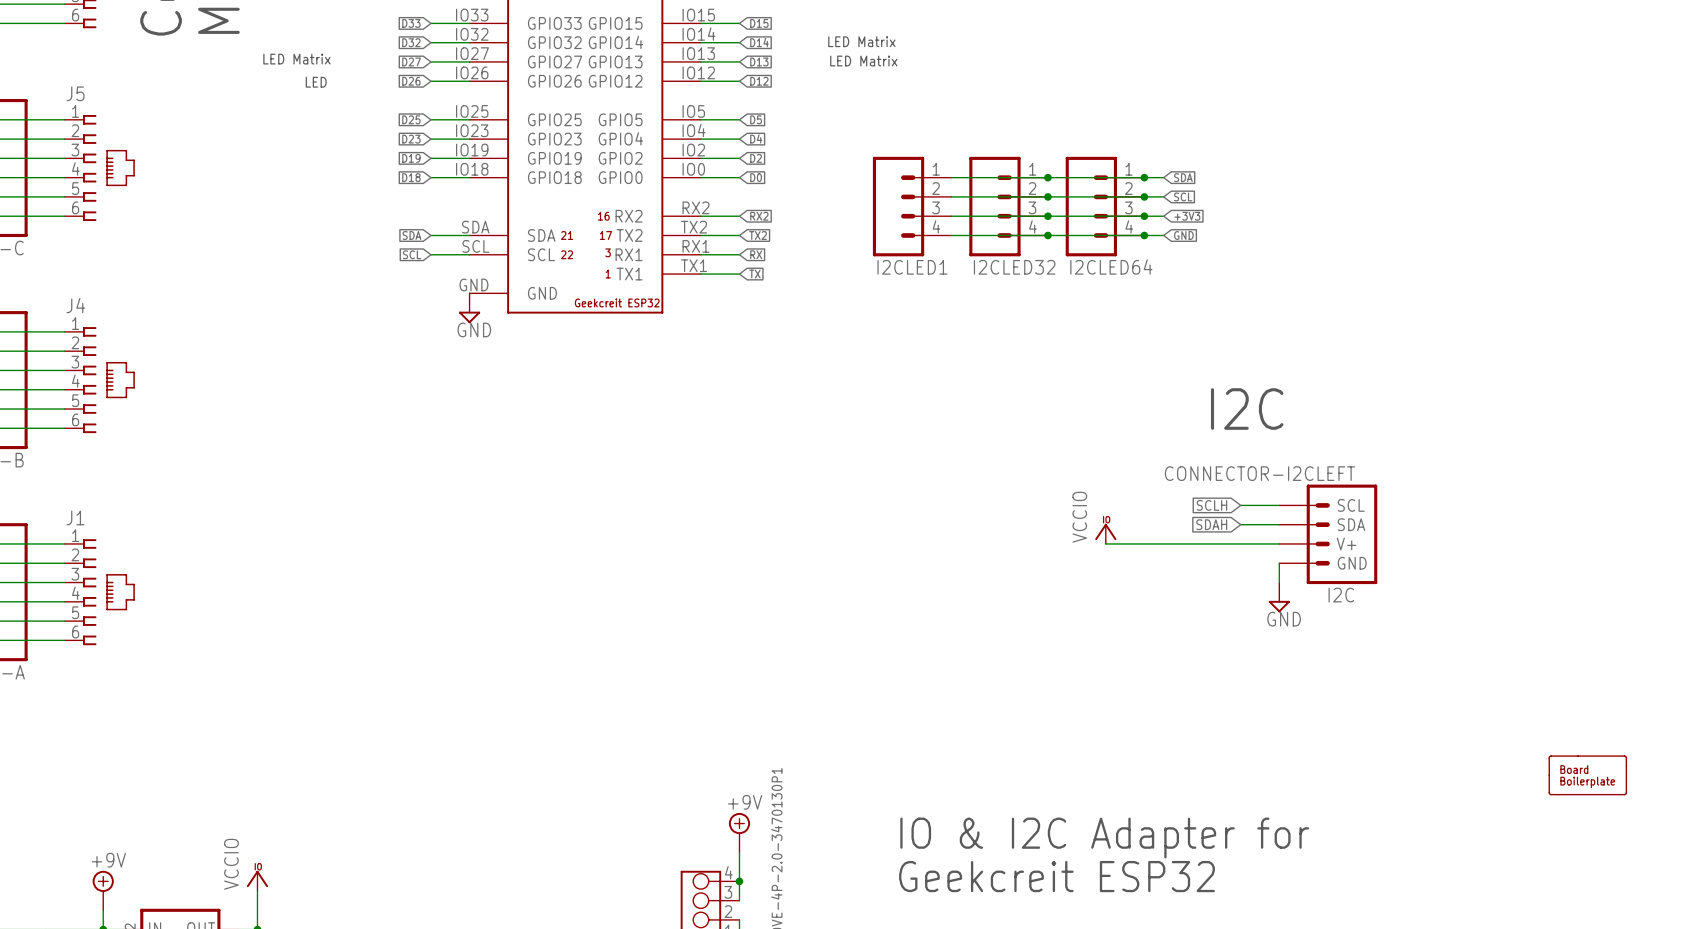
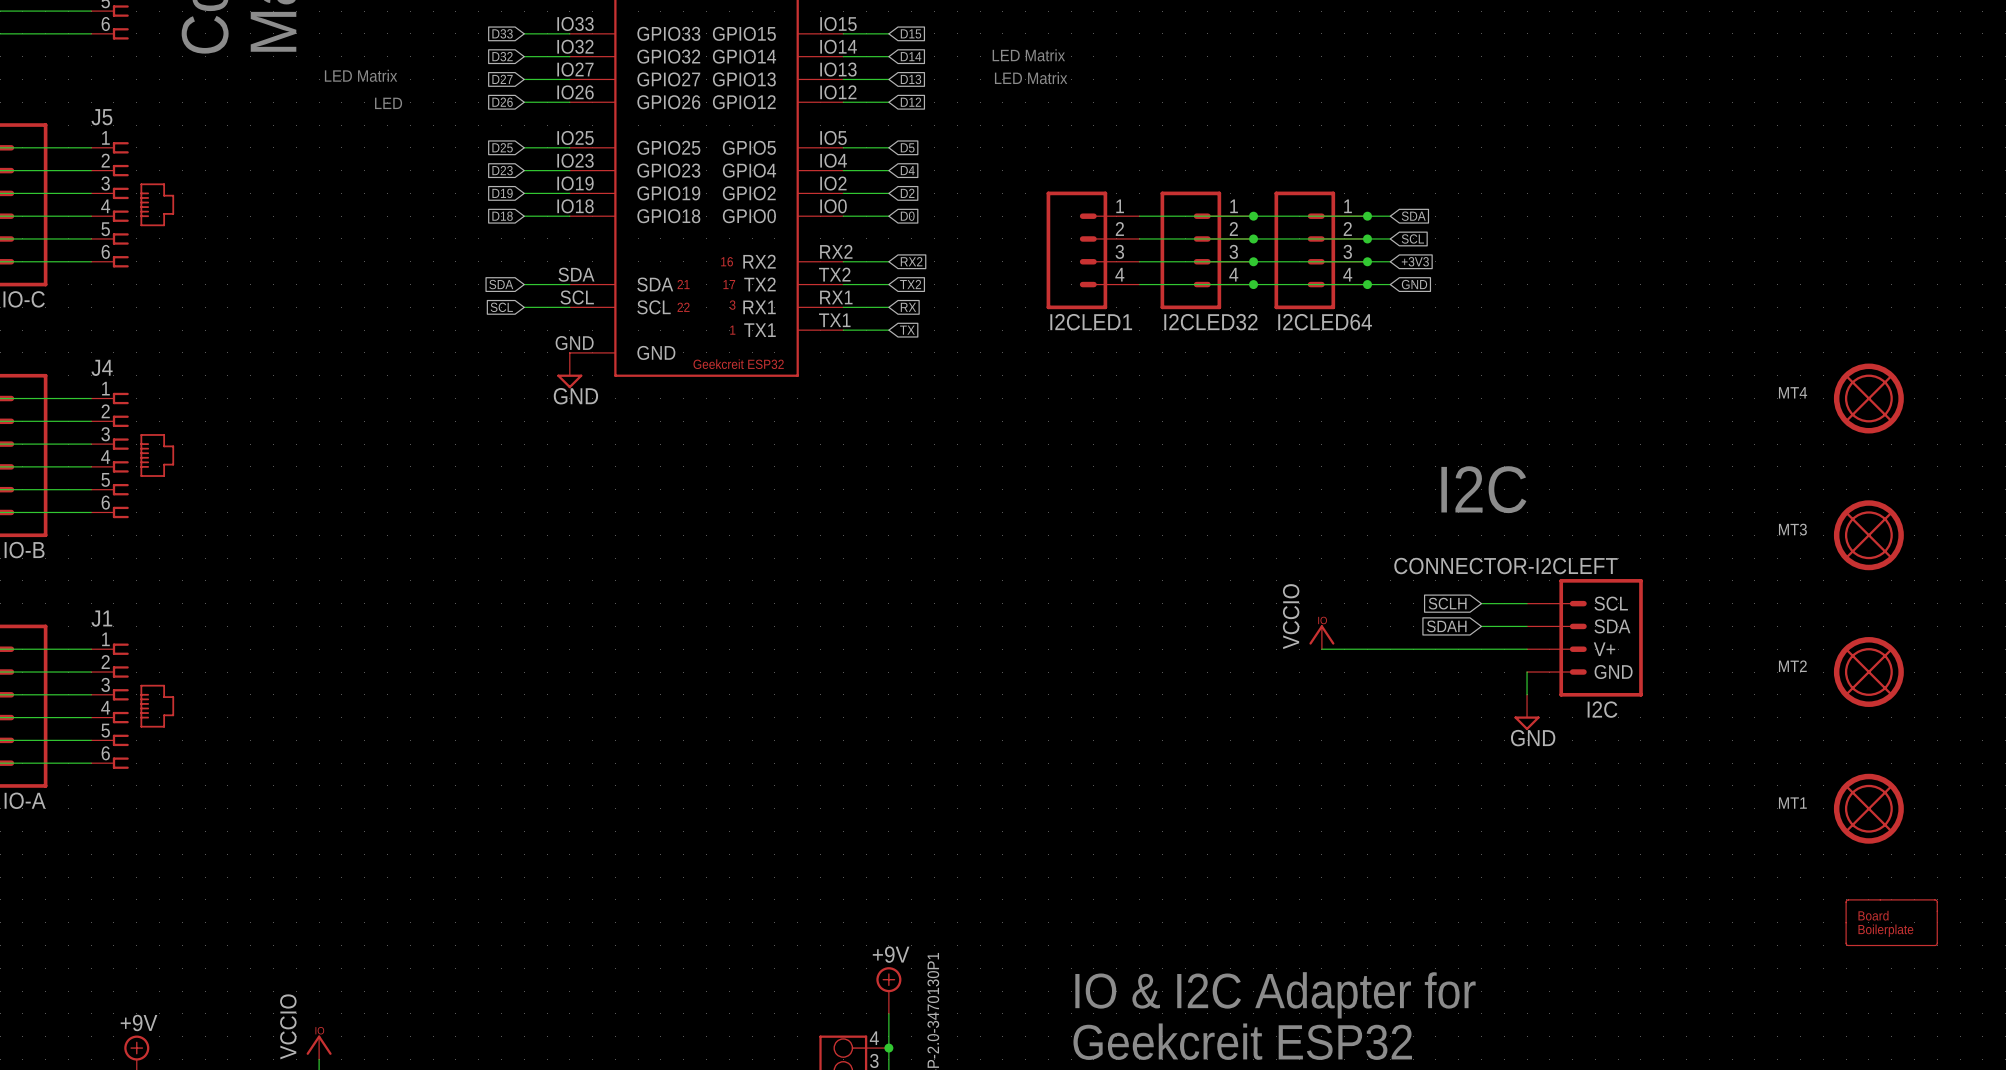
MT4: none -> (1868, 398)
MT3: none -> (1868, 535)
MT2: none -> (1868, 672)
MT1: none -> (1868, 808)

